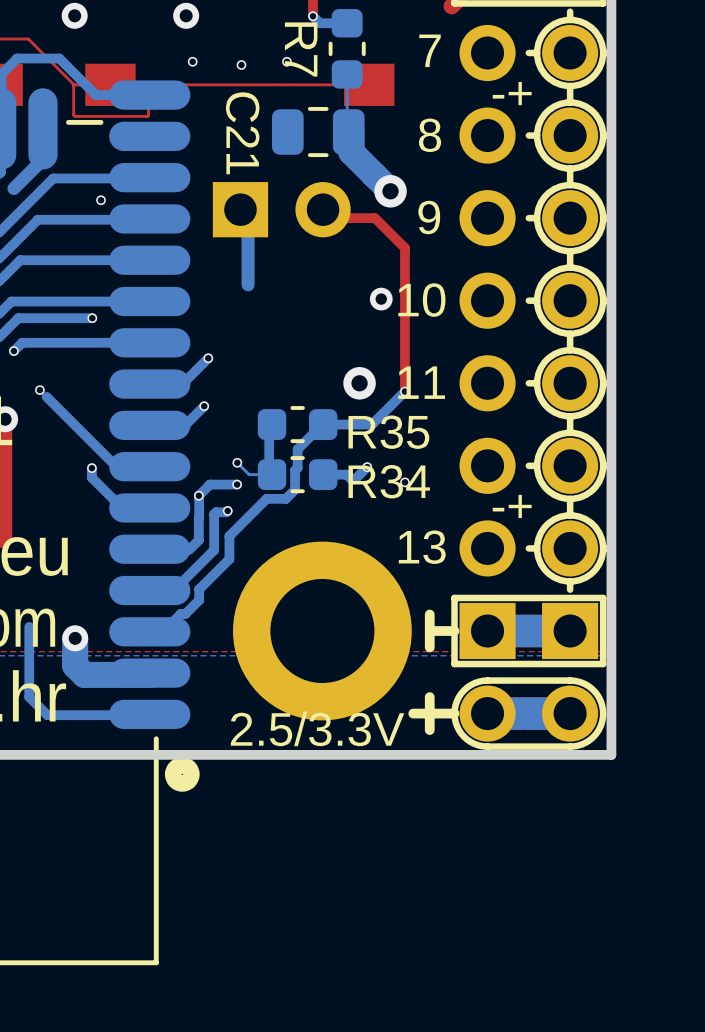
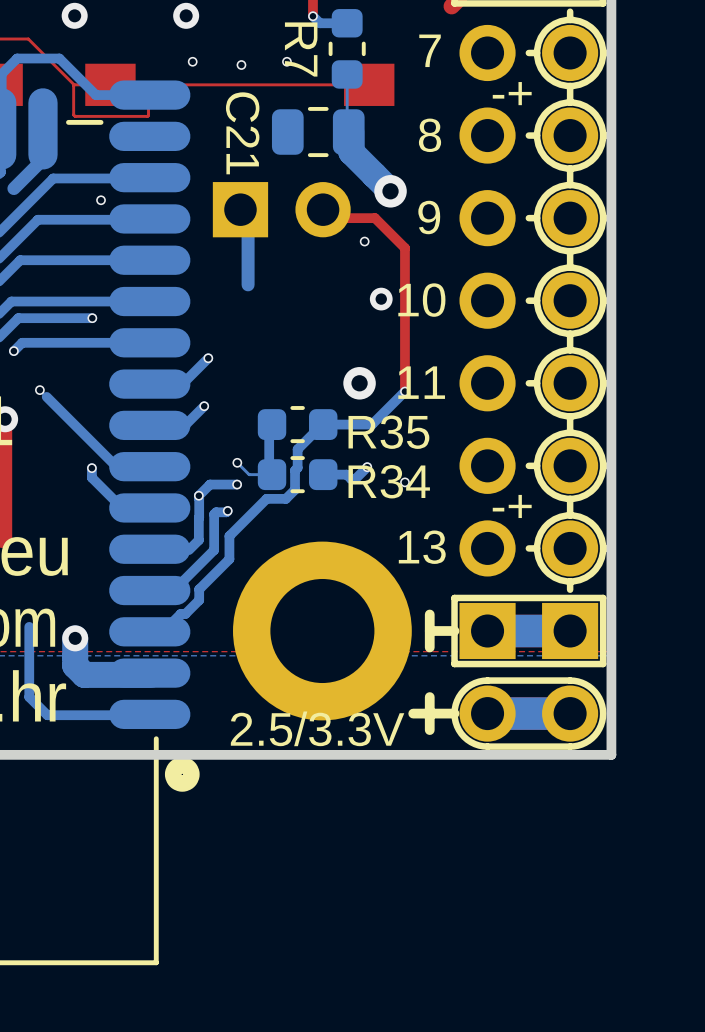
via: none -> (364, 241)

